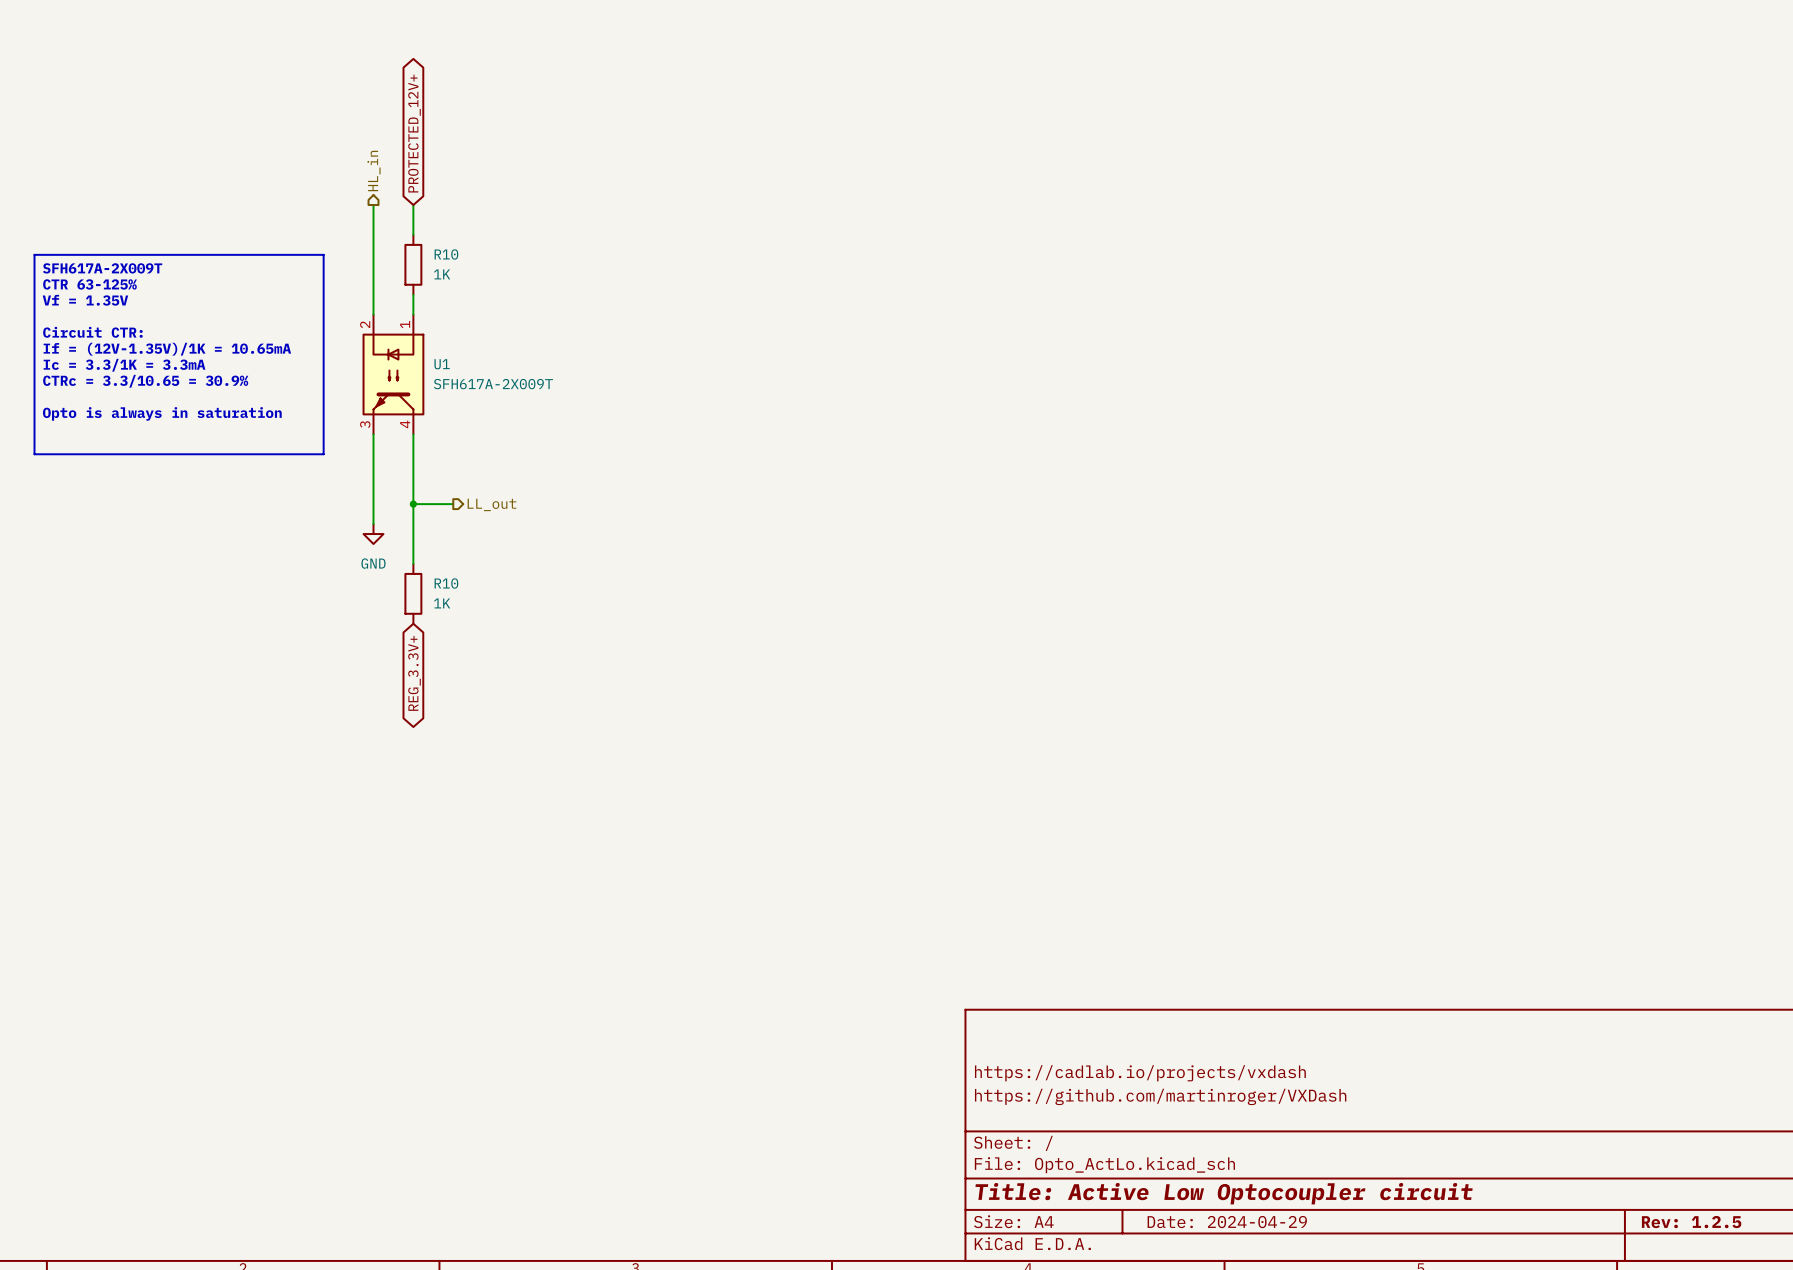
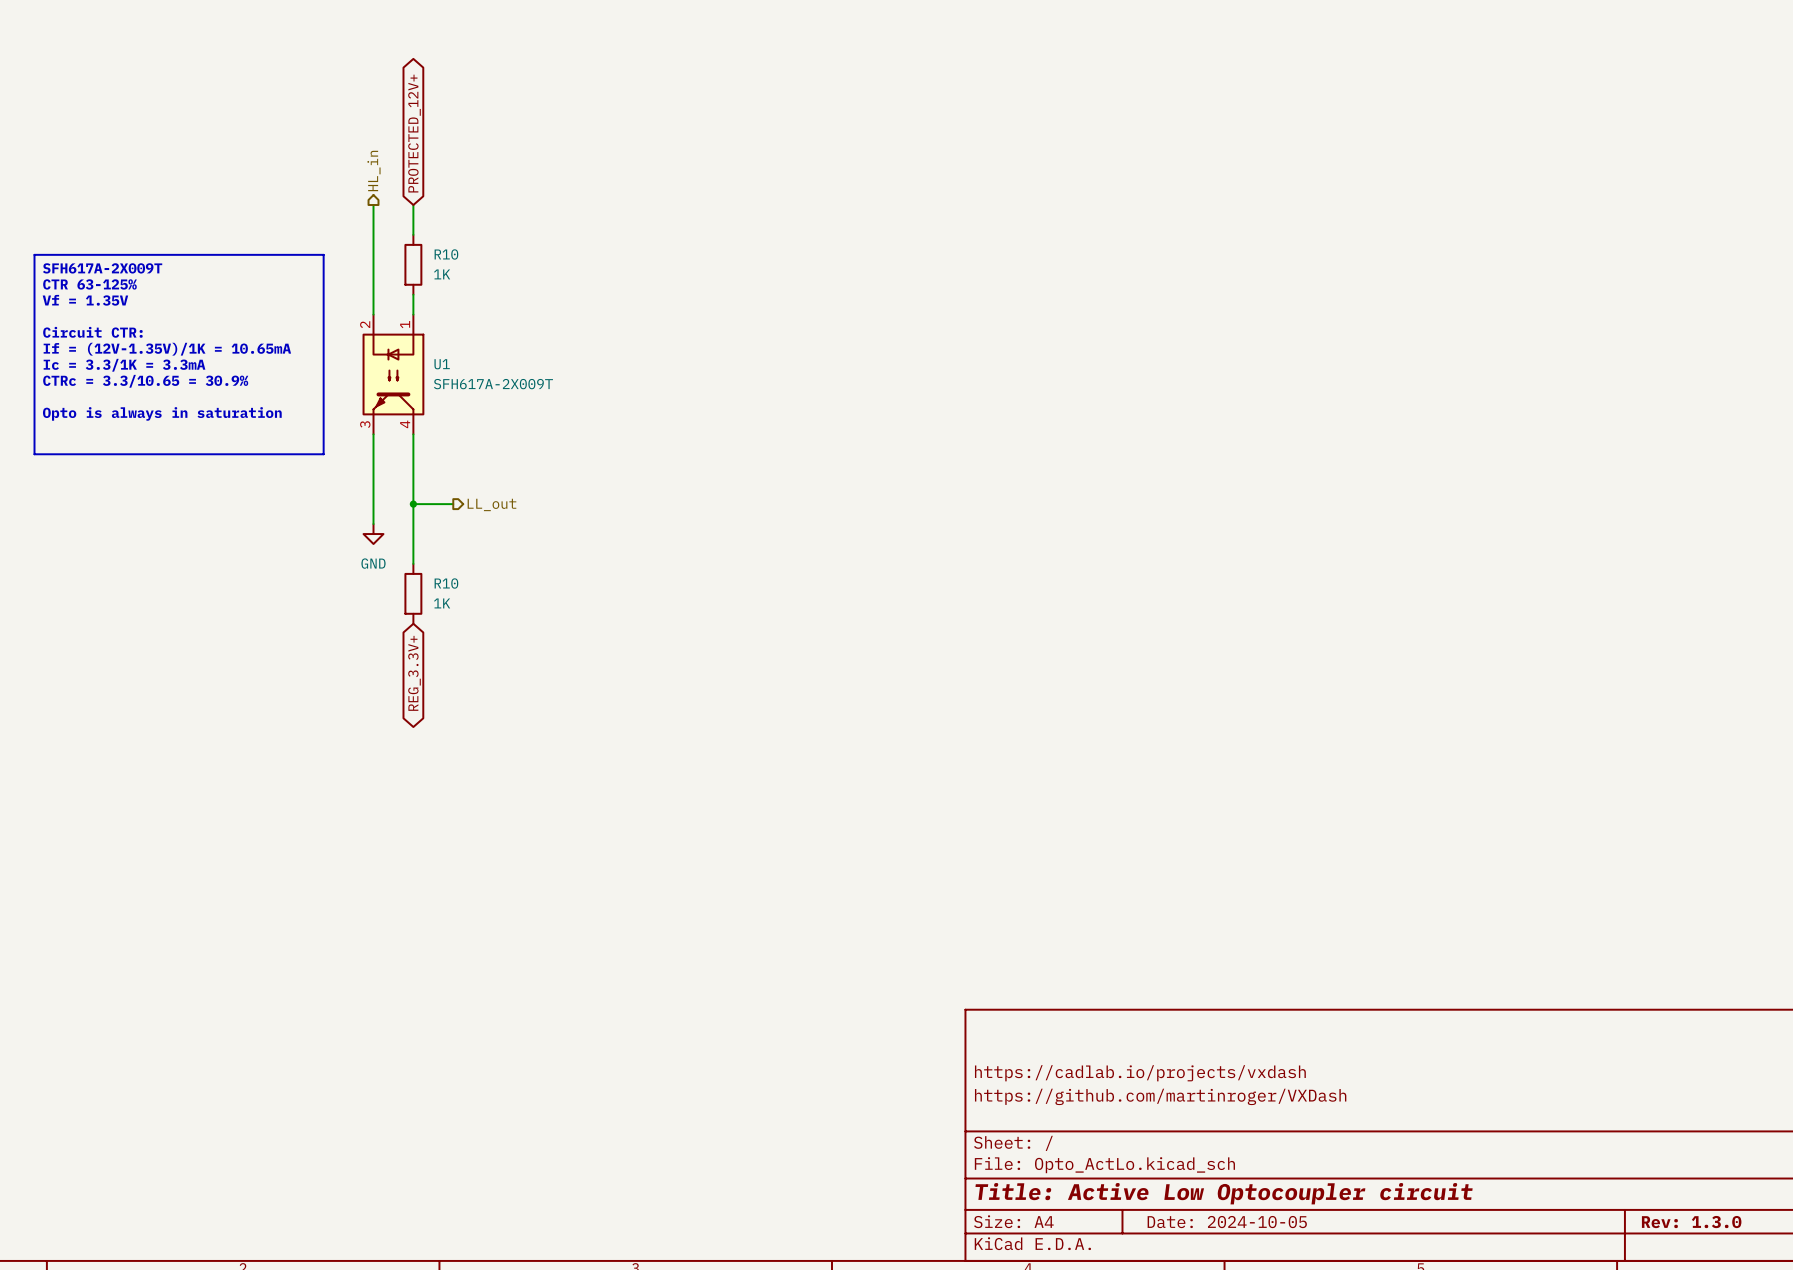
title block: Date: 2024-04-29 (1227, 1222) -> Date: 2024-10-05 (1227, 1222)
title block: Rev: 1.2.5 (1691, 1222) -> Rev: 1.3.0 (1691, 1222)

